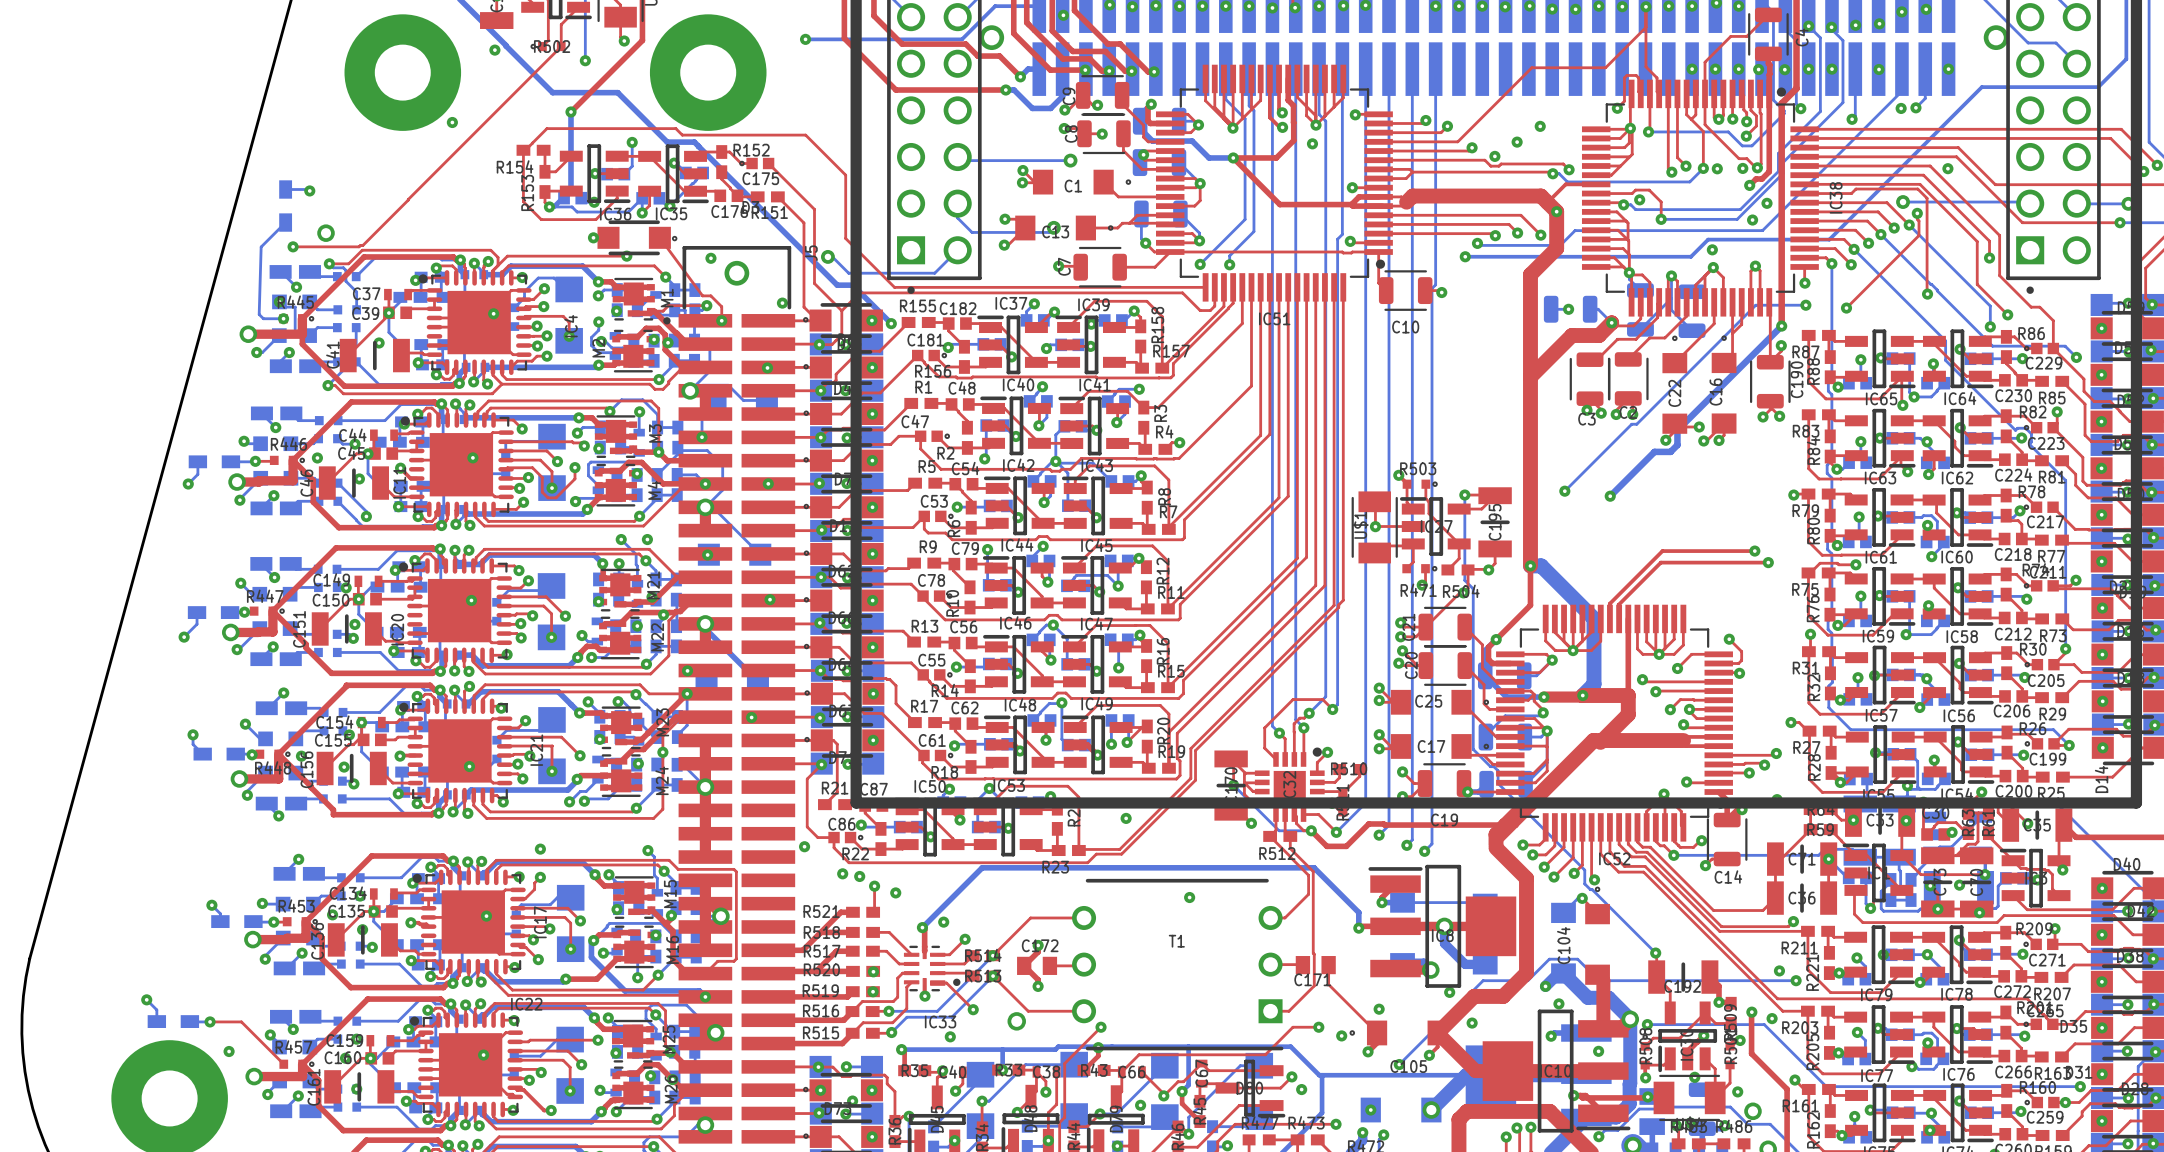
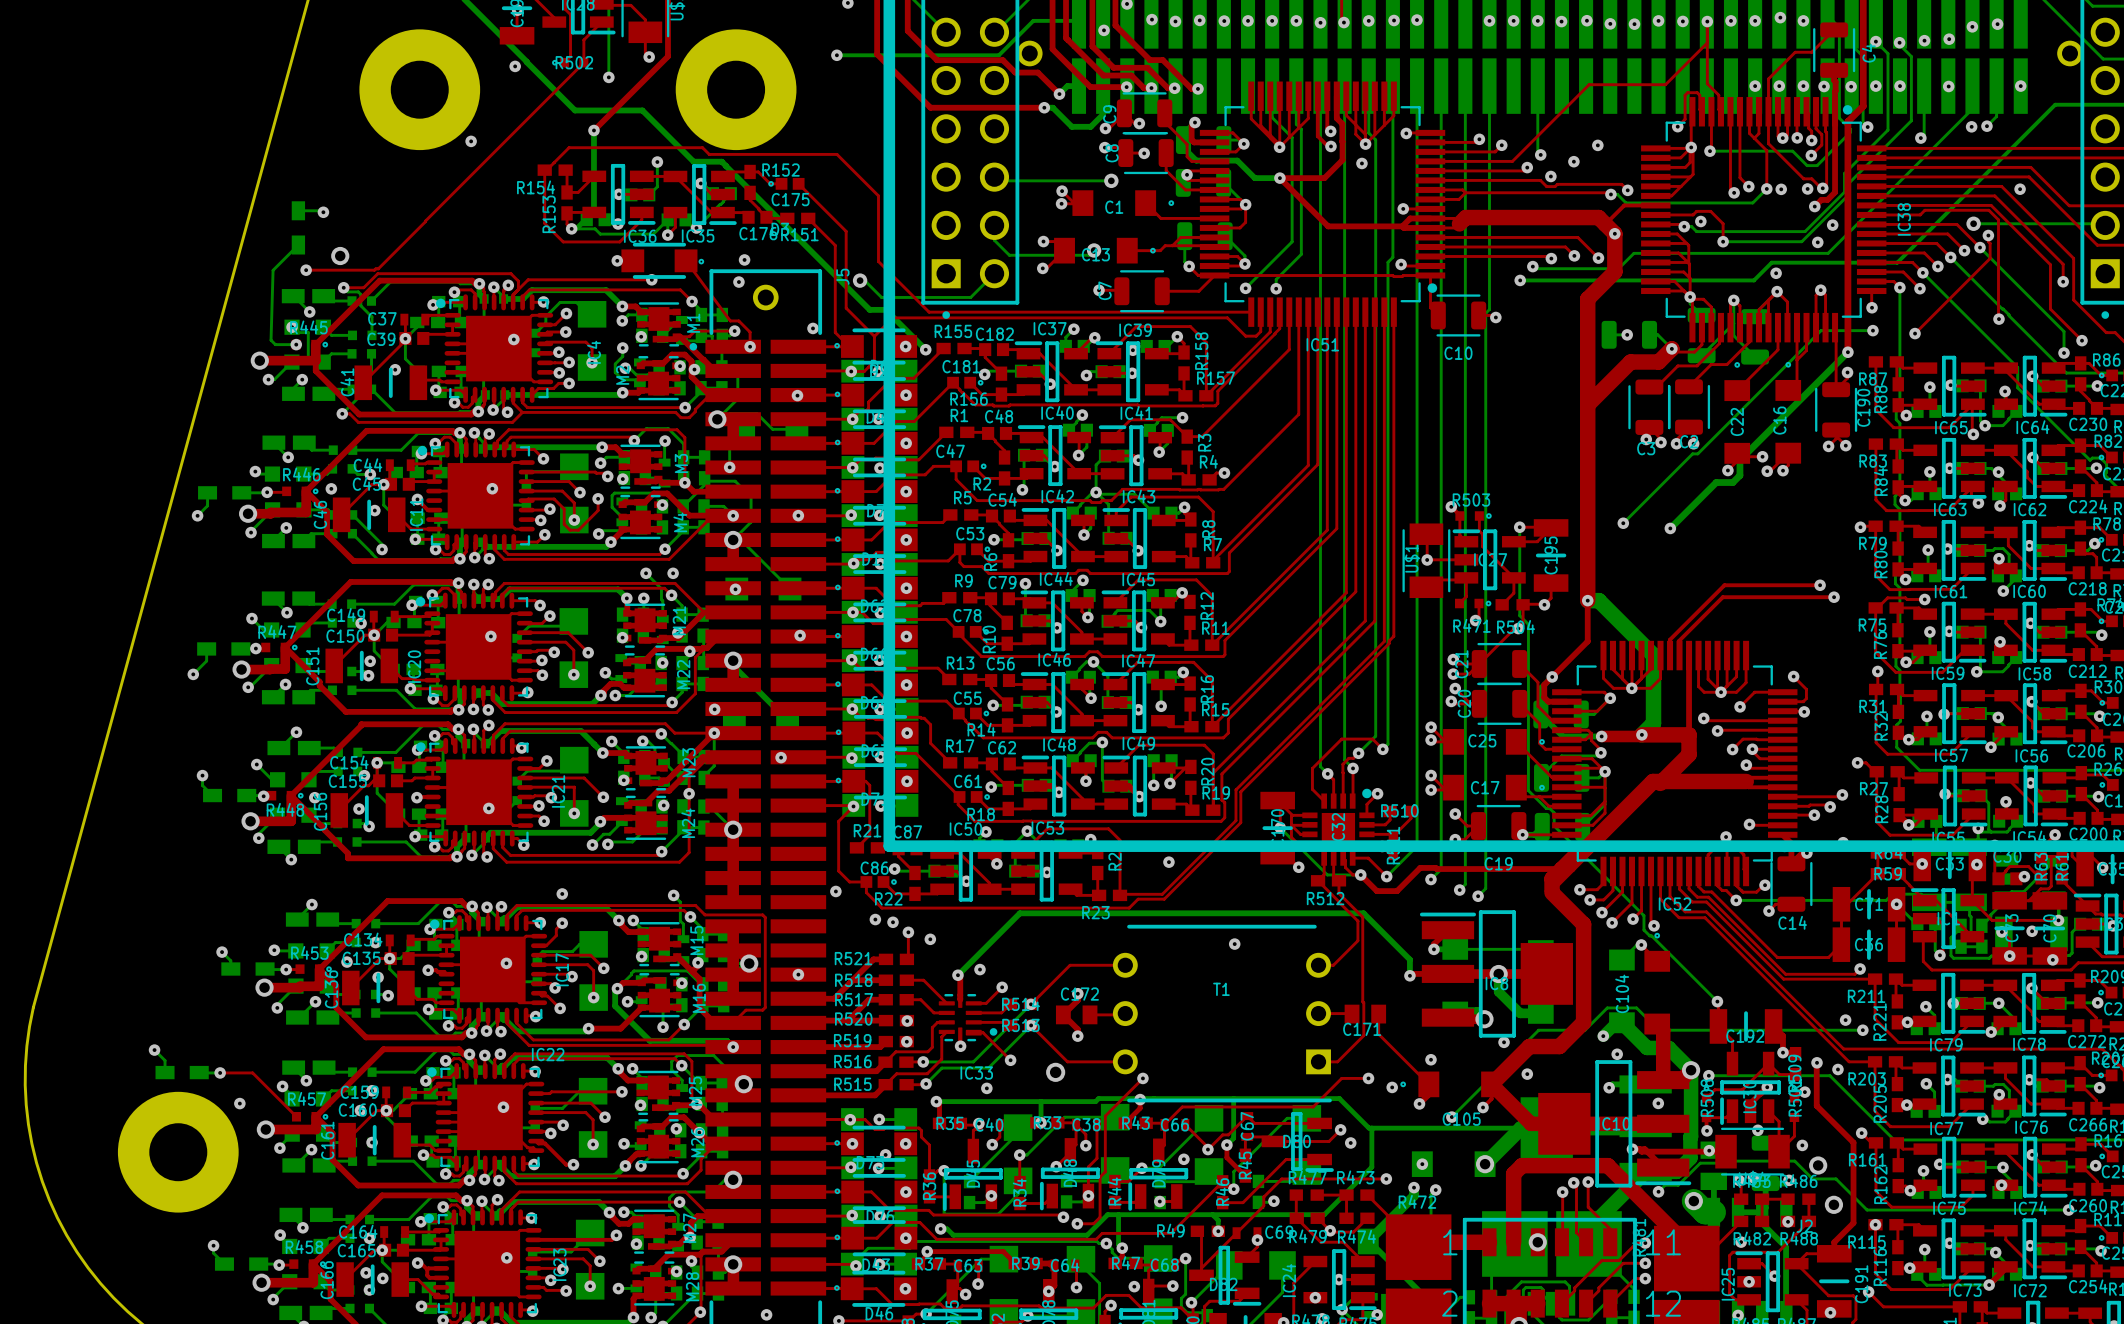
bottom track: none -> (1537, 86) (1537, 151) (1540, 154)
via: none -> (1540, 154)
via: none -> (744, 259)
via: none -> (798, 974)

